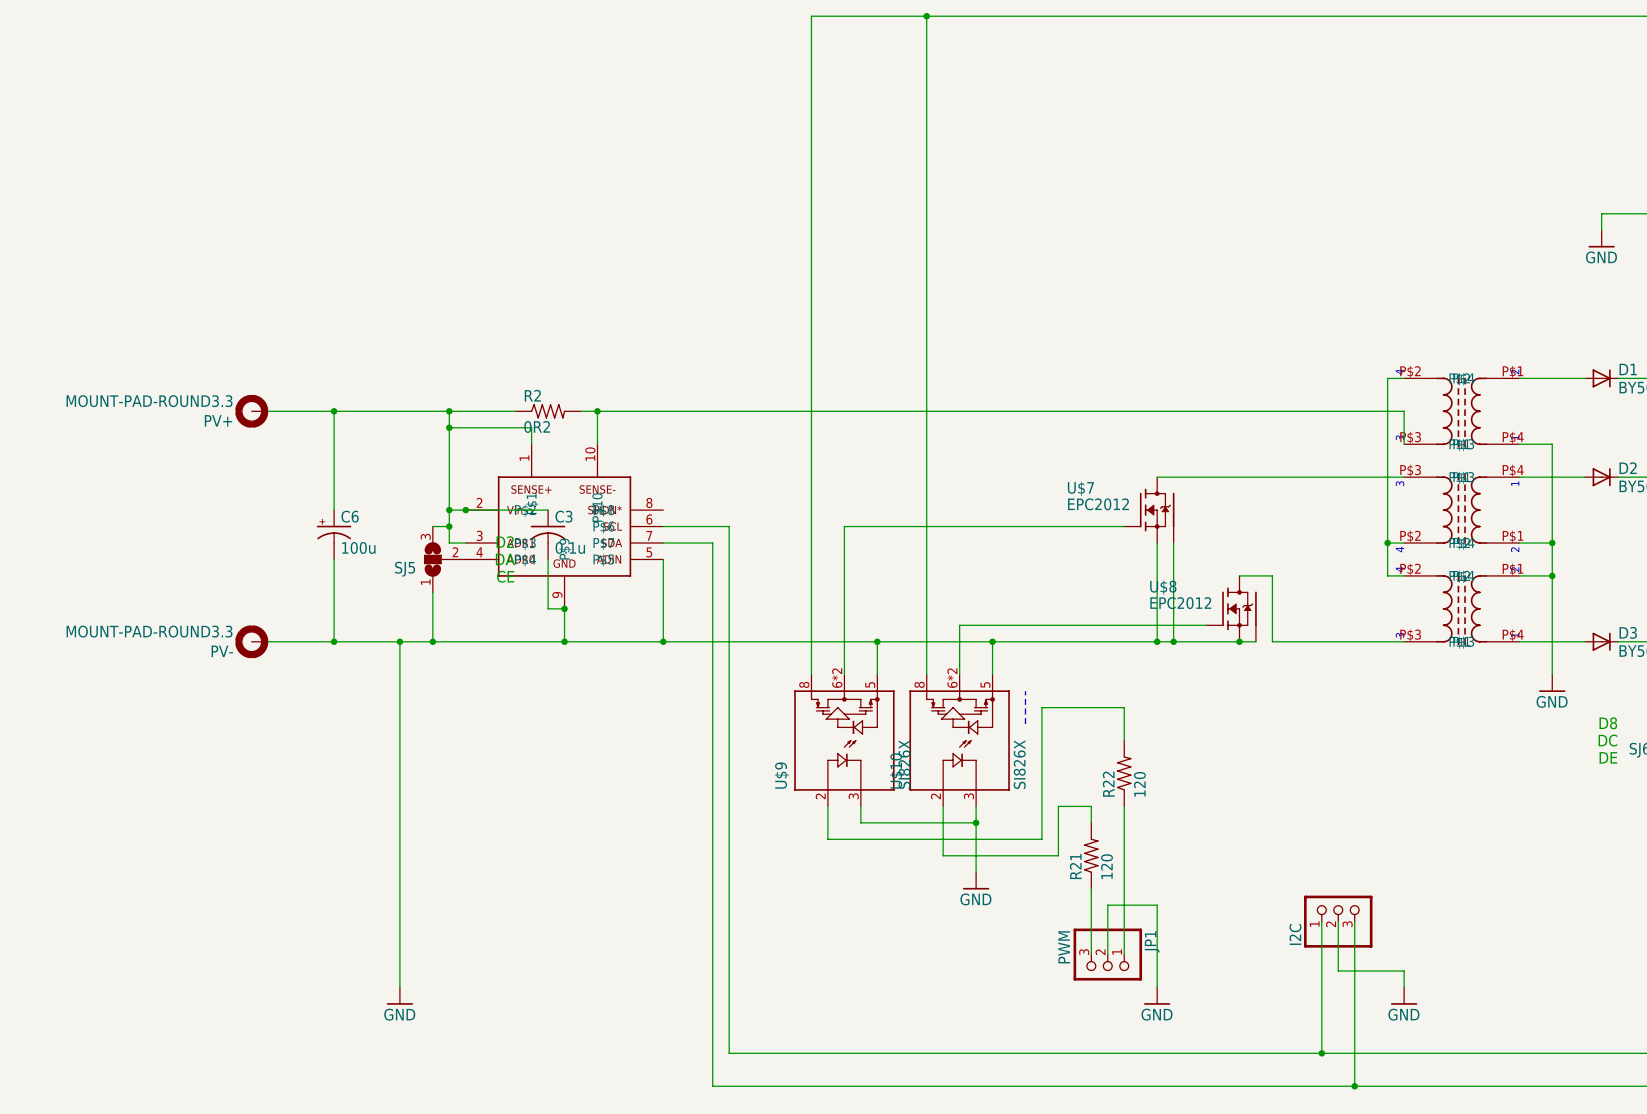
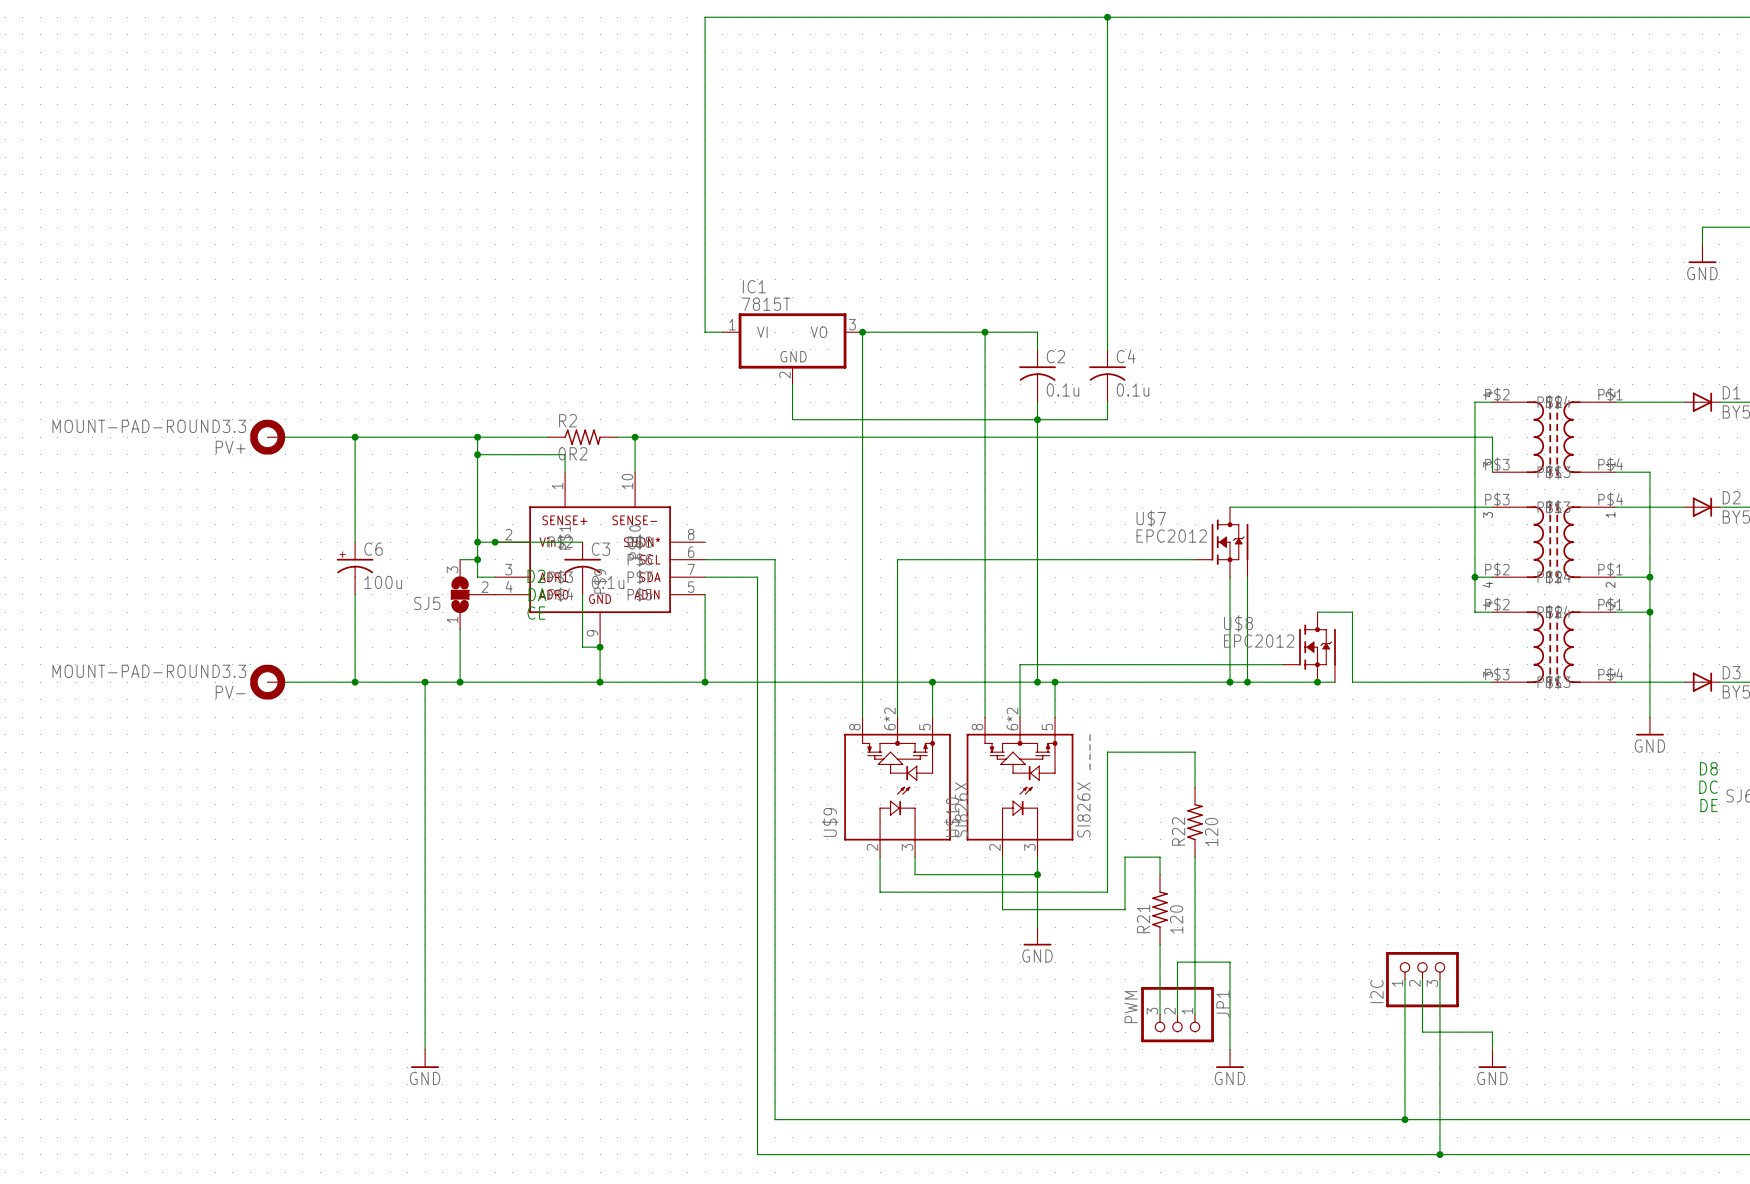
wire: (811, 16) (811, 312) -> (862, 17) (705, 17) (705, 332) (722, 332)
wire: (926, 16) (926, 312) -> none
junction: (926, 16) -> none
wire: none -> (1107, 17) (1107, 349)
junction: none -> (1107, 17)
wire: none -> (862, 332) (1037, 332) (1037, 349)
junction: none -> (862, 332)
junction: none -> (985, 332)
IC1: none -> 7815T (792, 349)
C2: none -> 0.1u (1037, 375)
C4: none -> 0.1u (1107, 375)
wire: none -> (792, 384) (792, 419) (1107, 419) (1107, 402)
wire: none -> (1037, 402) (1037, 682)
junction: none -> (1037, 419)
junction: none -> (1037, 682)

